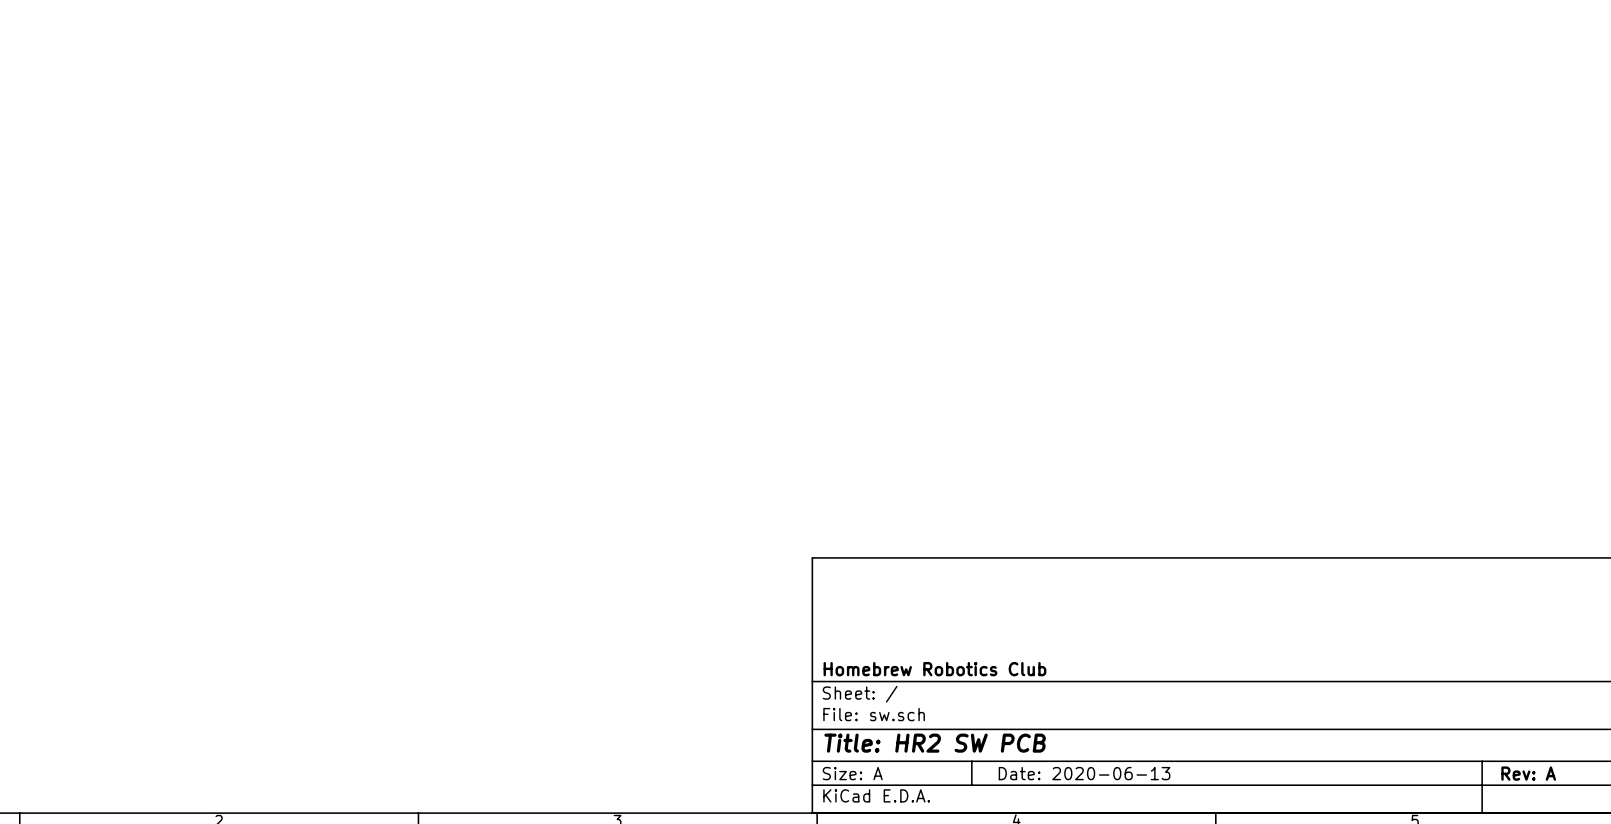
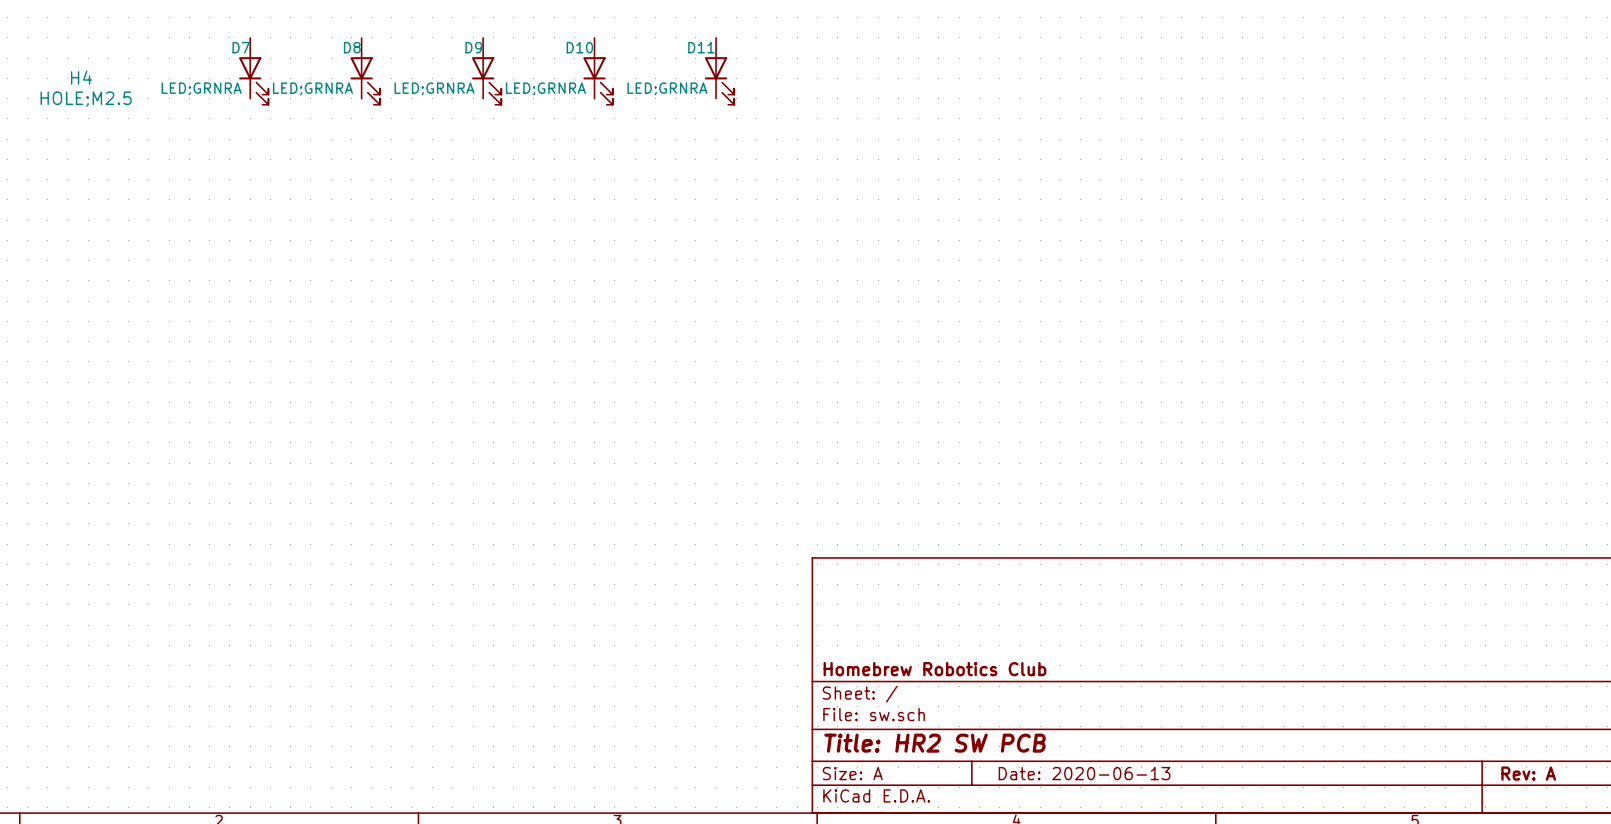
D7: none -> LED;GRNRA (253, 71)
D8: none -> LED;GRNRA (365, 71)
D9: none -> LED;GRNRA (486, 71)
D10: none -> LED;GRNRA (598, 71)
D11: none -> LED;GRNRA (719, 71)
H4: none -> HOLE;M2.5 (86, 88)

